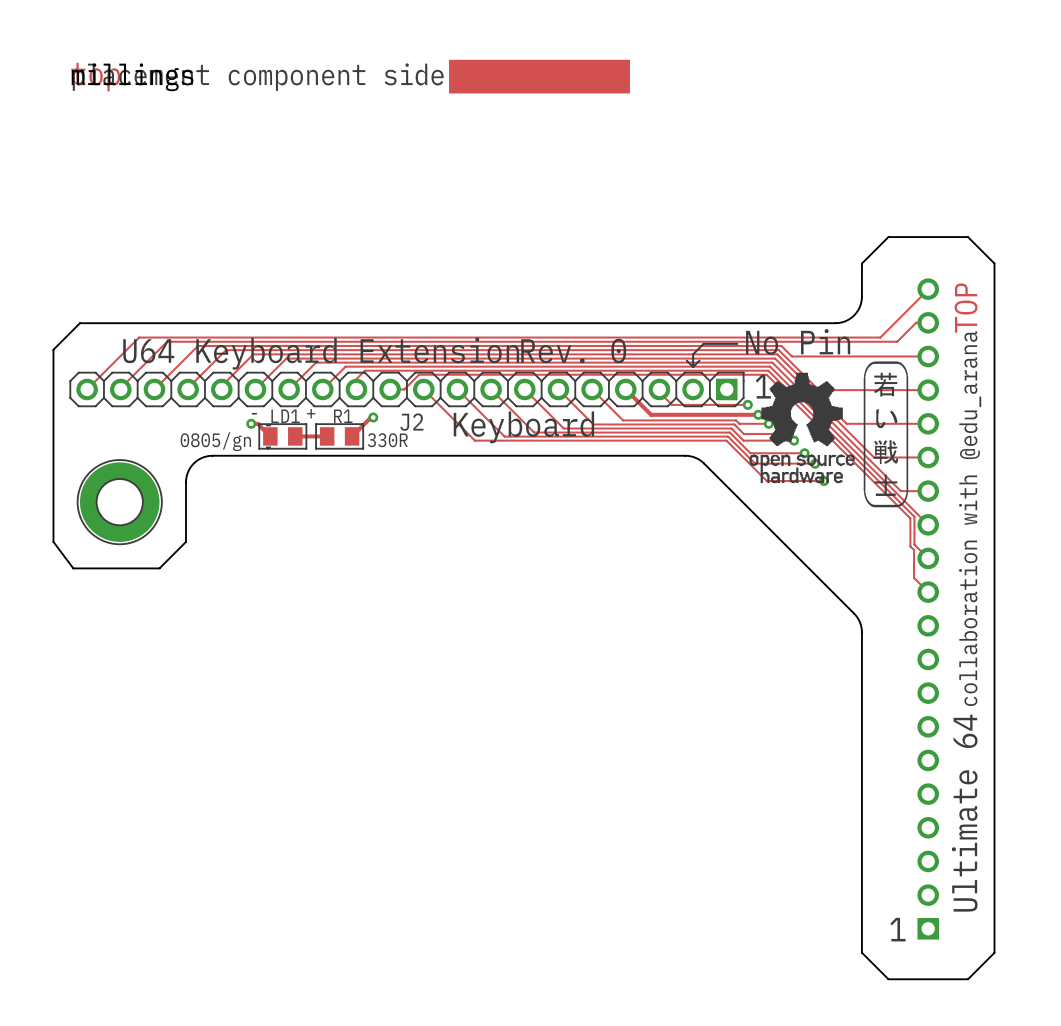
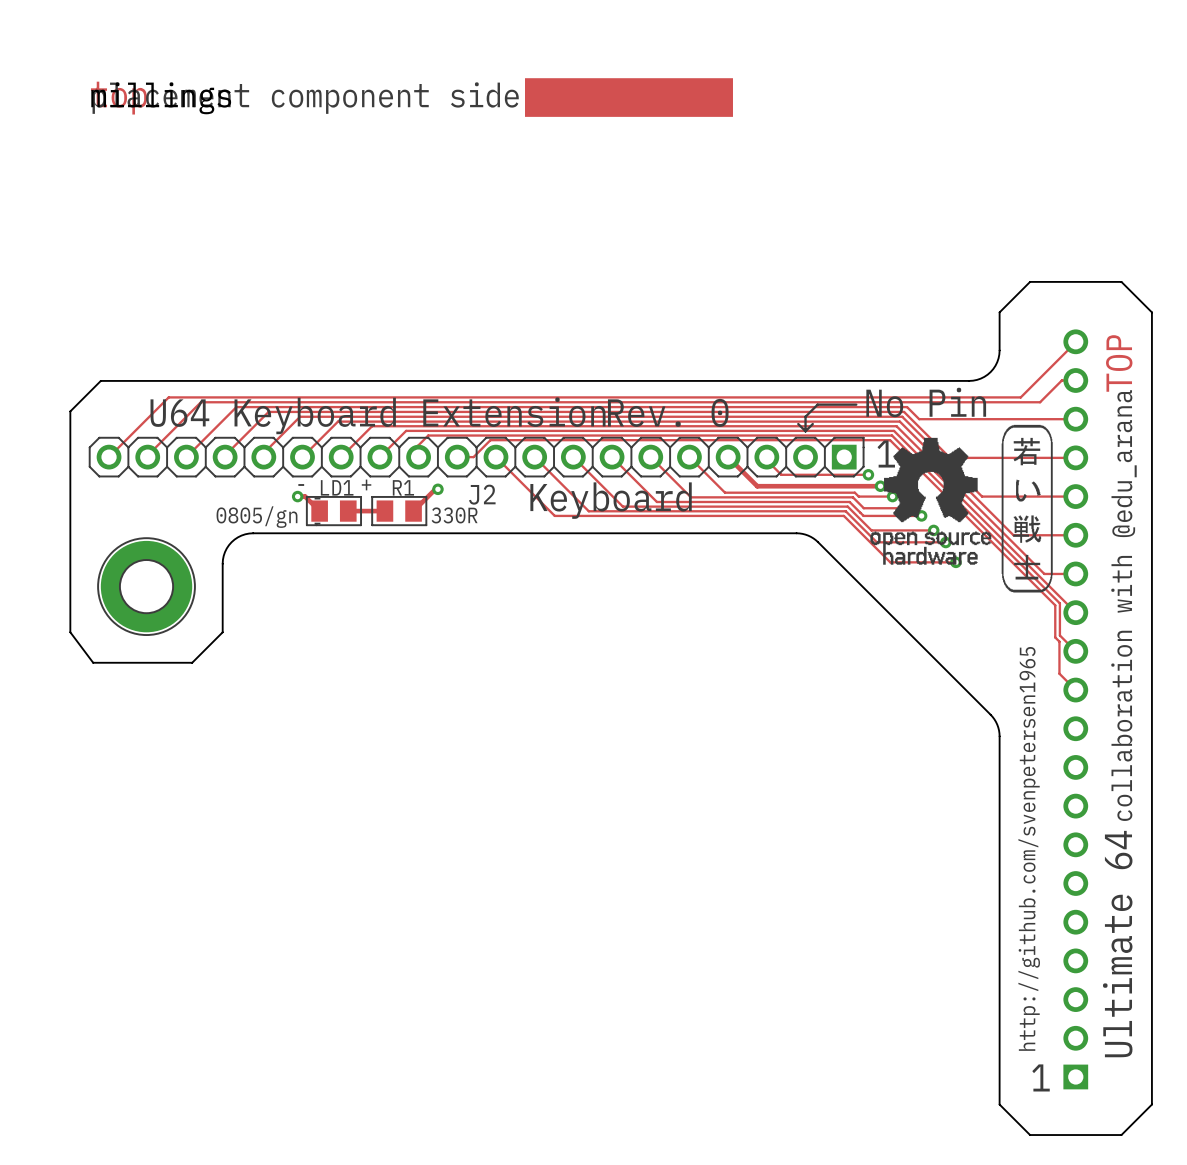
text: none -> http://github.com/svenpetersen1965 (1029, 848)

